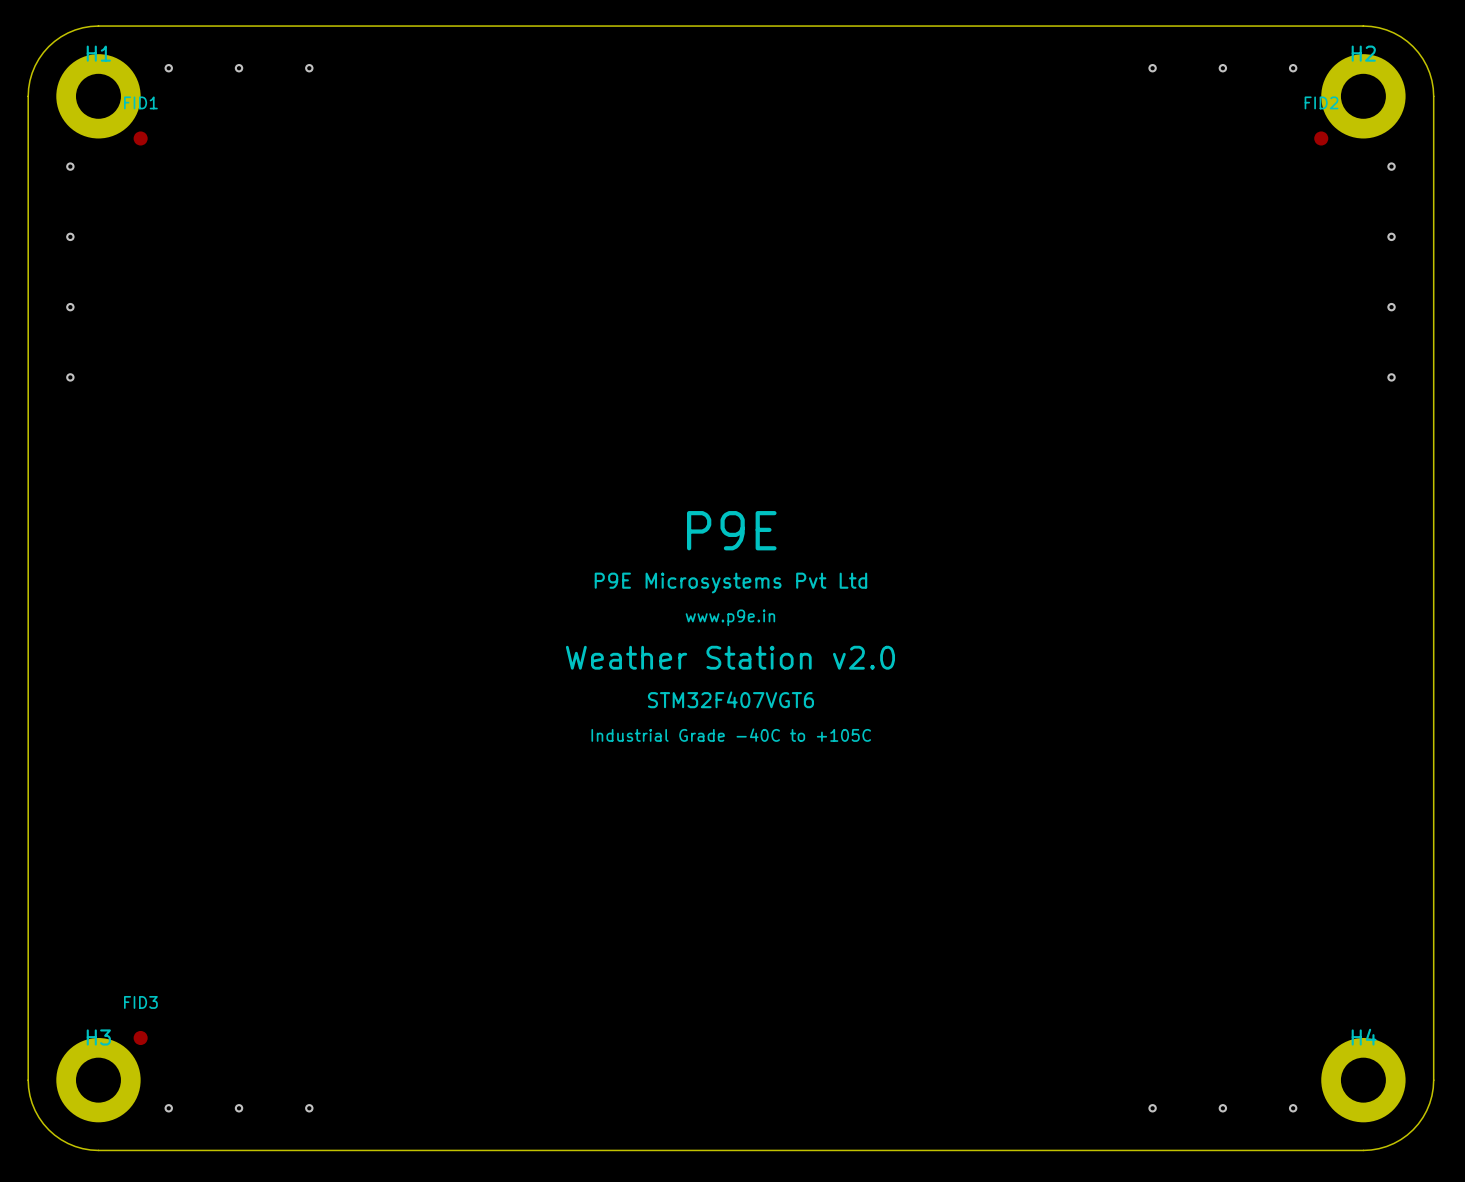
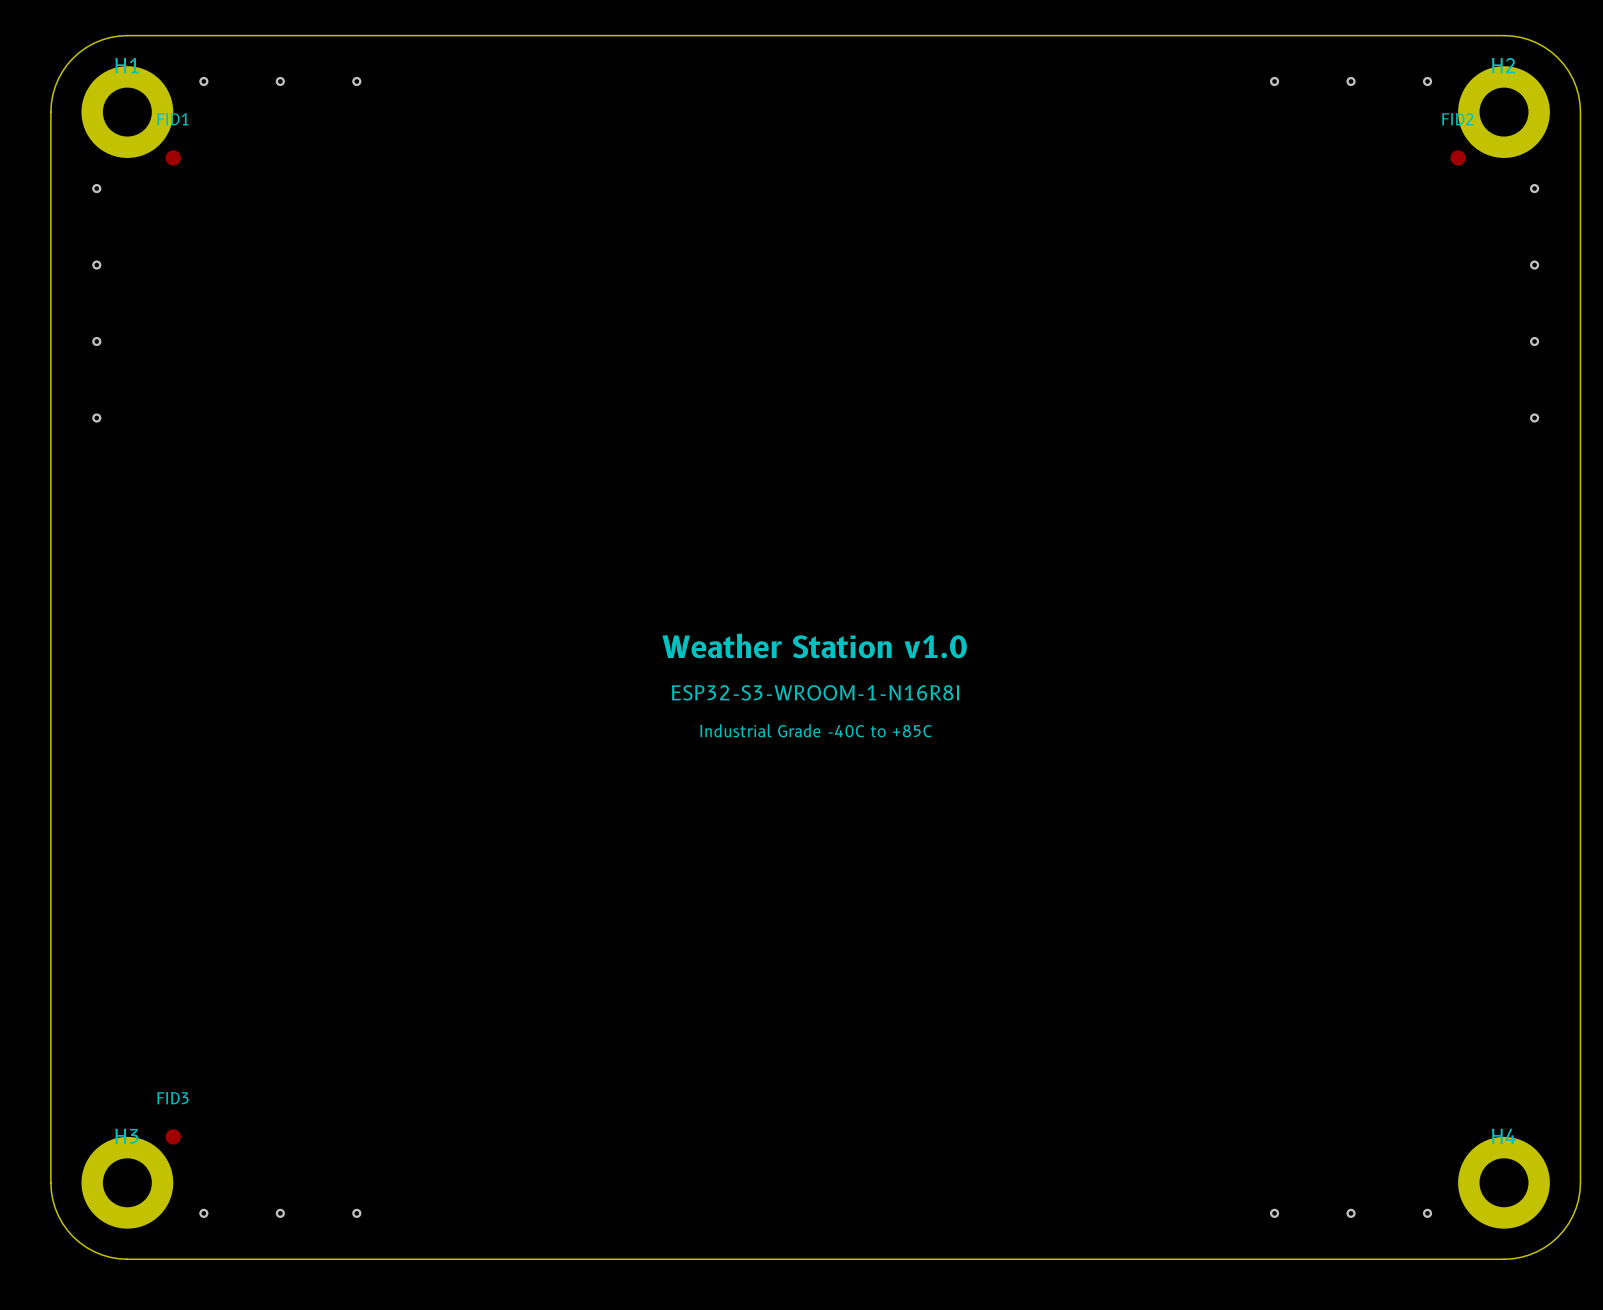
text: P9E (731, 530) -> none
text: P9E Microsystems Pvt Ltd (730, 583) -> Weather Station v1.0 (814, 645)
text: www.p9e.in (730, 617) -> none
text: none -> ESP32-S3-WROOM-1-N16R8I (815, 692)
text: Weather Station v2.0 (730, 657) -> Industrial Grade -40C to +85C (816, 730)
text: STM32F407VGT6 (730, 699) -> none
text: Industrial Grade -40C to +105C (731, 735) -> none

